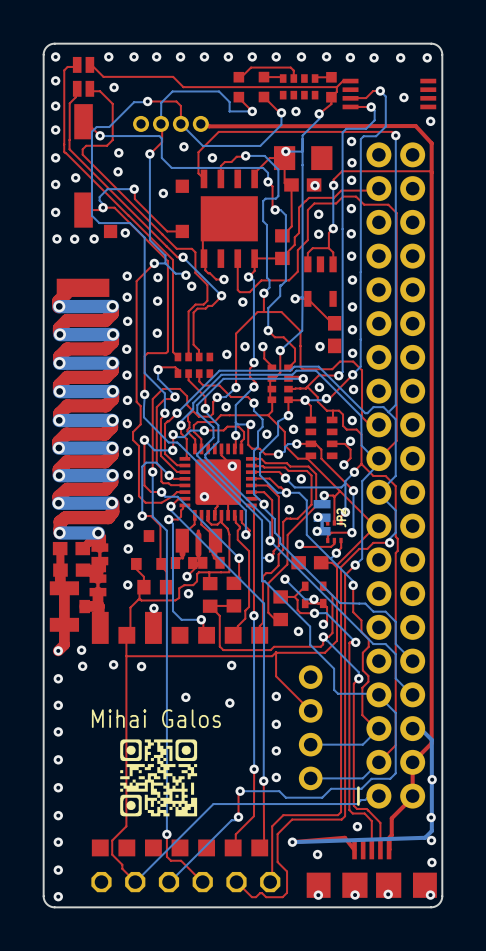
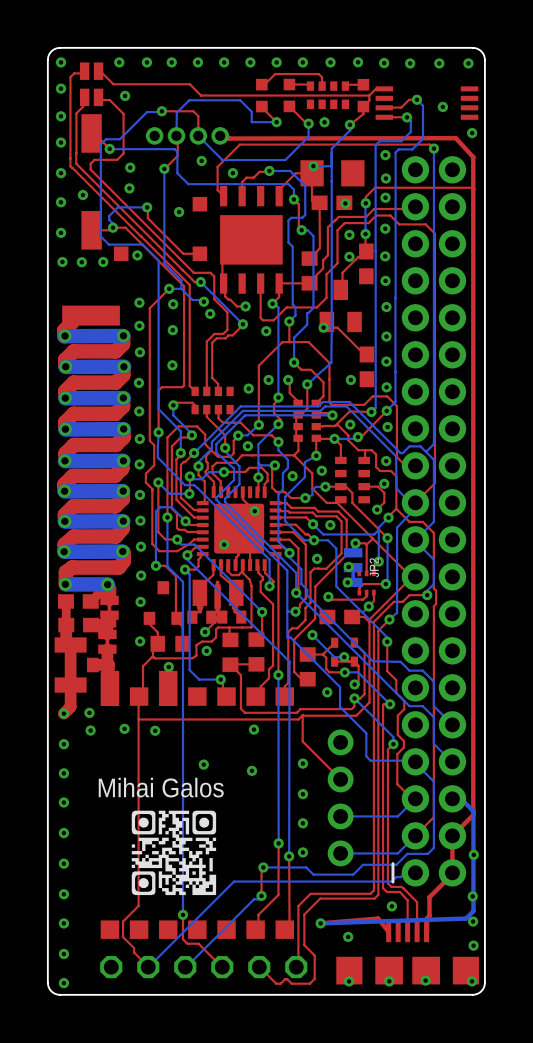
bottom track: (333, 185) (333, 228) -> (365, 203) (365, 234)
top track: none -> (365, 234) (365, 257) (366, 257) (366, 251) (360, 256) (358, 256) (342, 272) (342, 288)
top track: (333, 228) (328, 233) (328, 248) -> none
via position: (333, 228) -> (365, 234)
part: none -> (366, 263)
top track: (328, 248) (312, 248) (307, 253) (307, 264) -> none
top track: (328, 248) (333, 252) (333, 264) -> none
part footprint: [304, 256, 337, 307] -> [319, 279, 362, 333]

